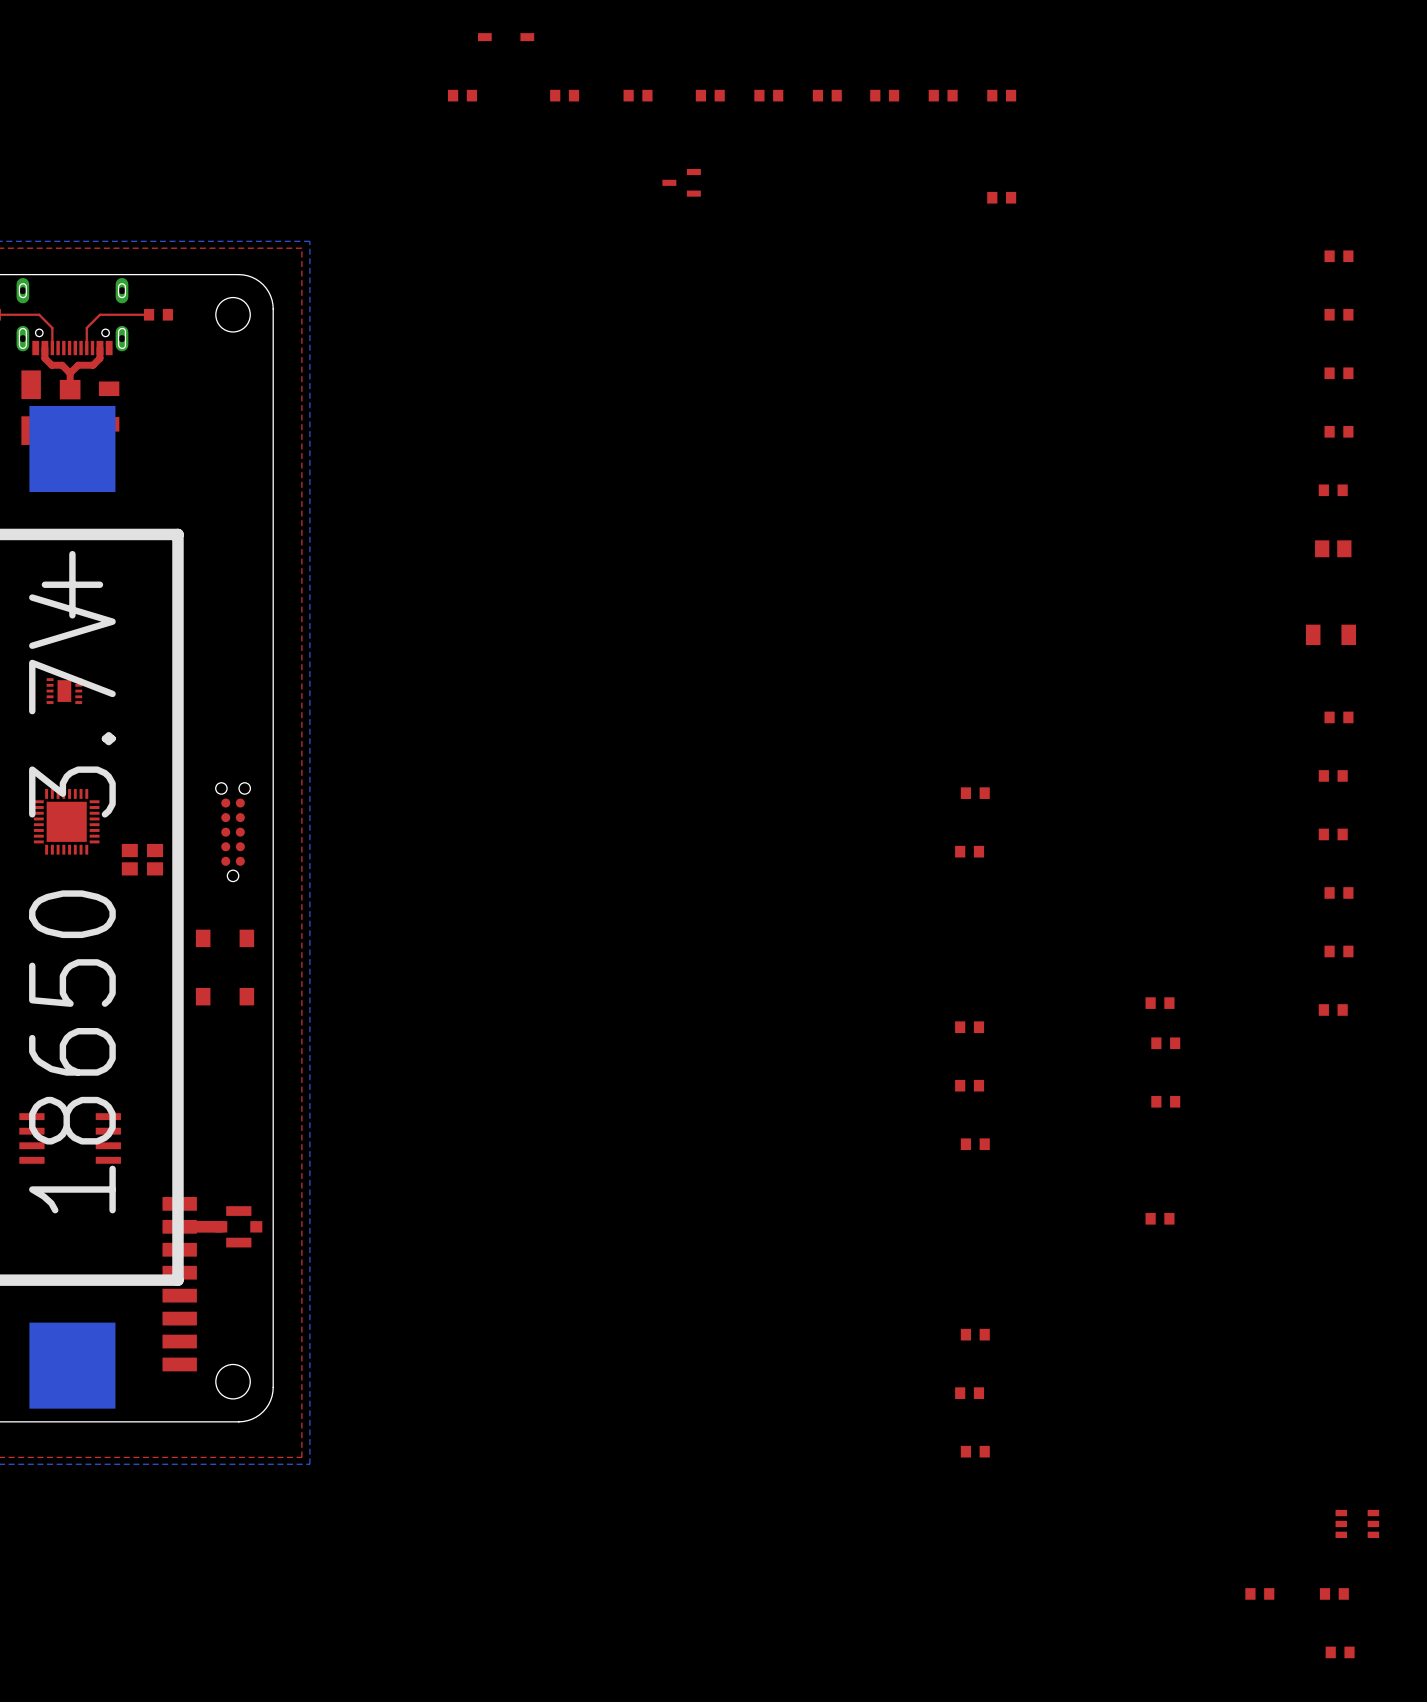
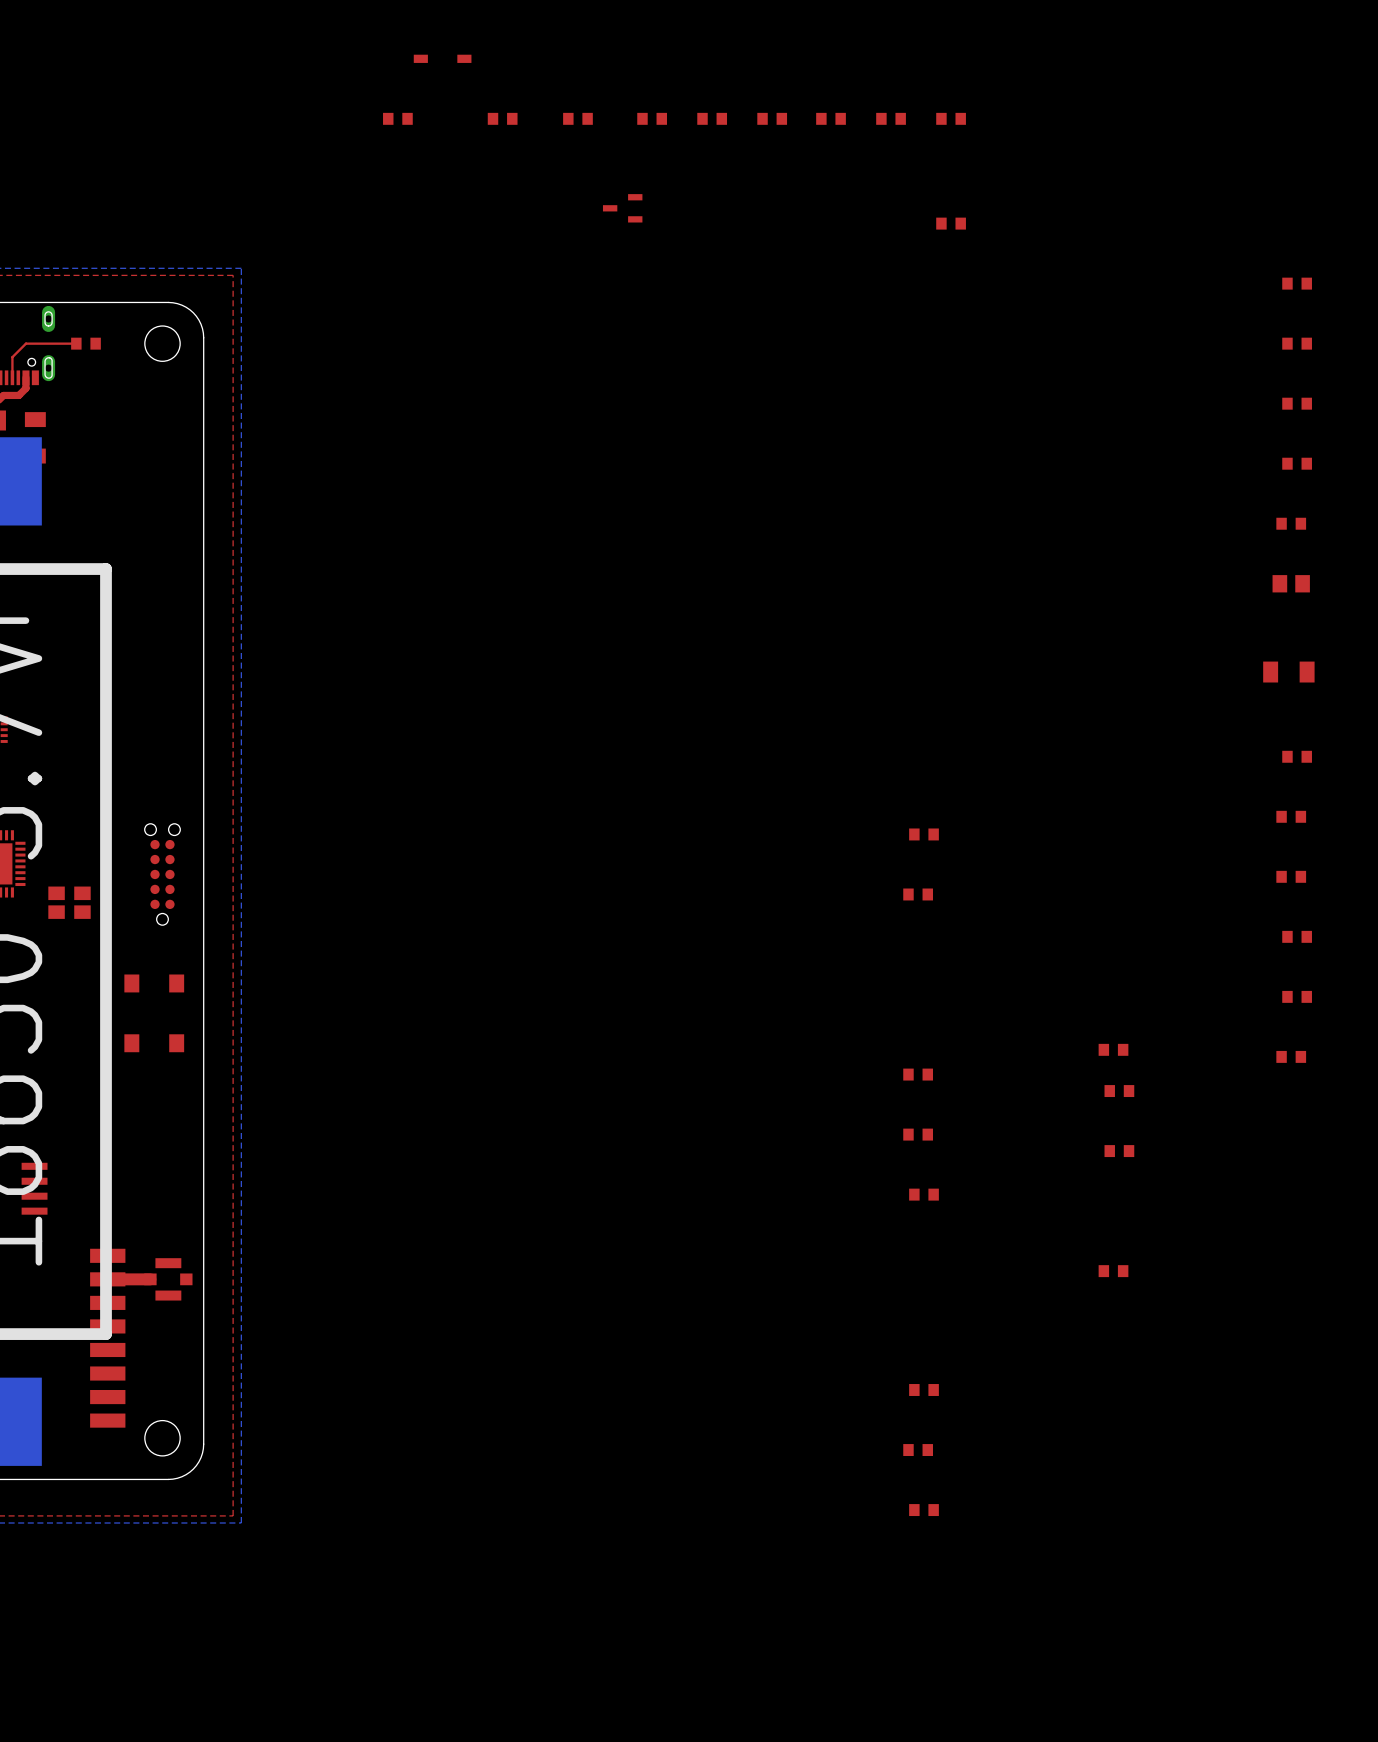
part: (1357, 1523) -> none
part: (1259, 1593) -> none
part: (1334, 1593) -> none
part: (1340, 1652) -> none

